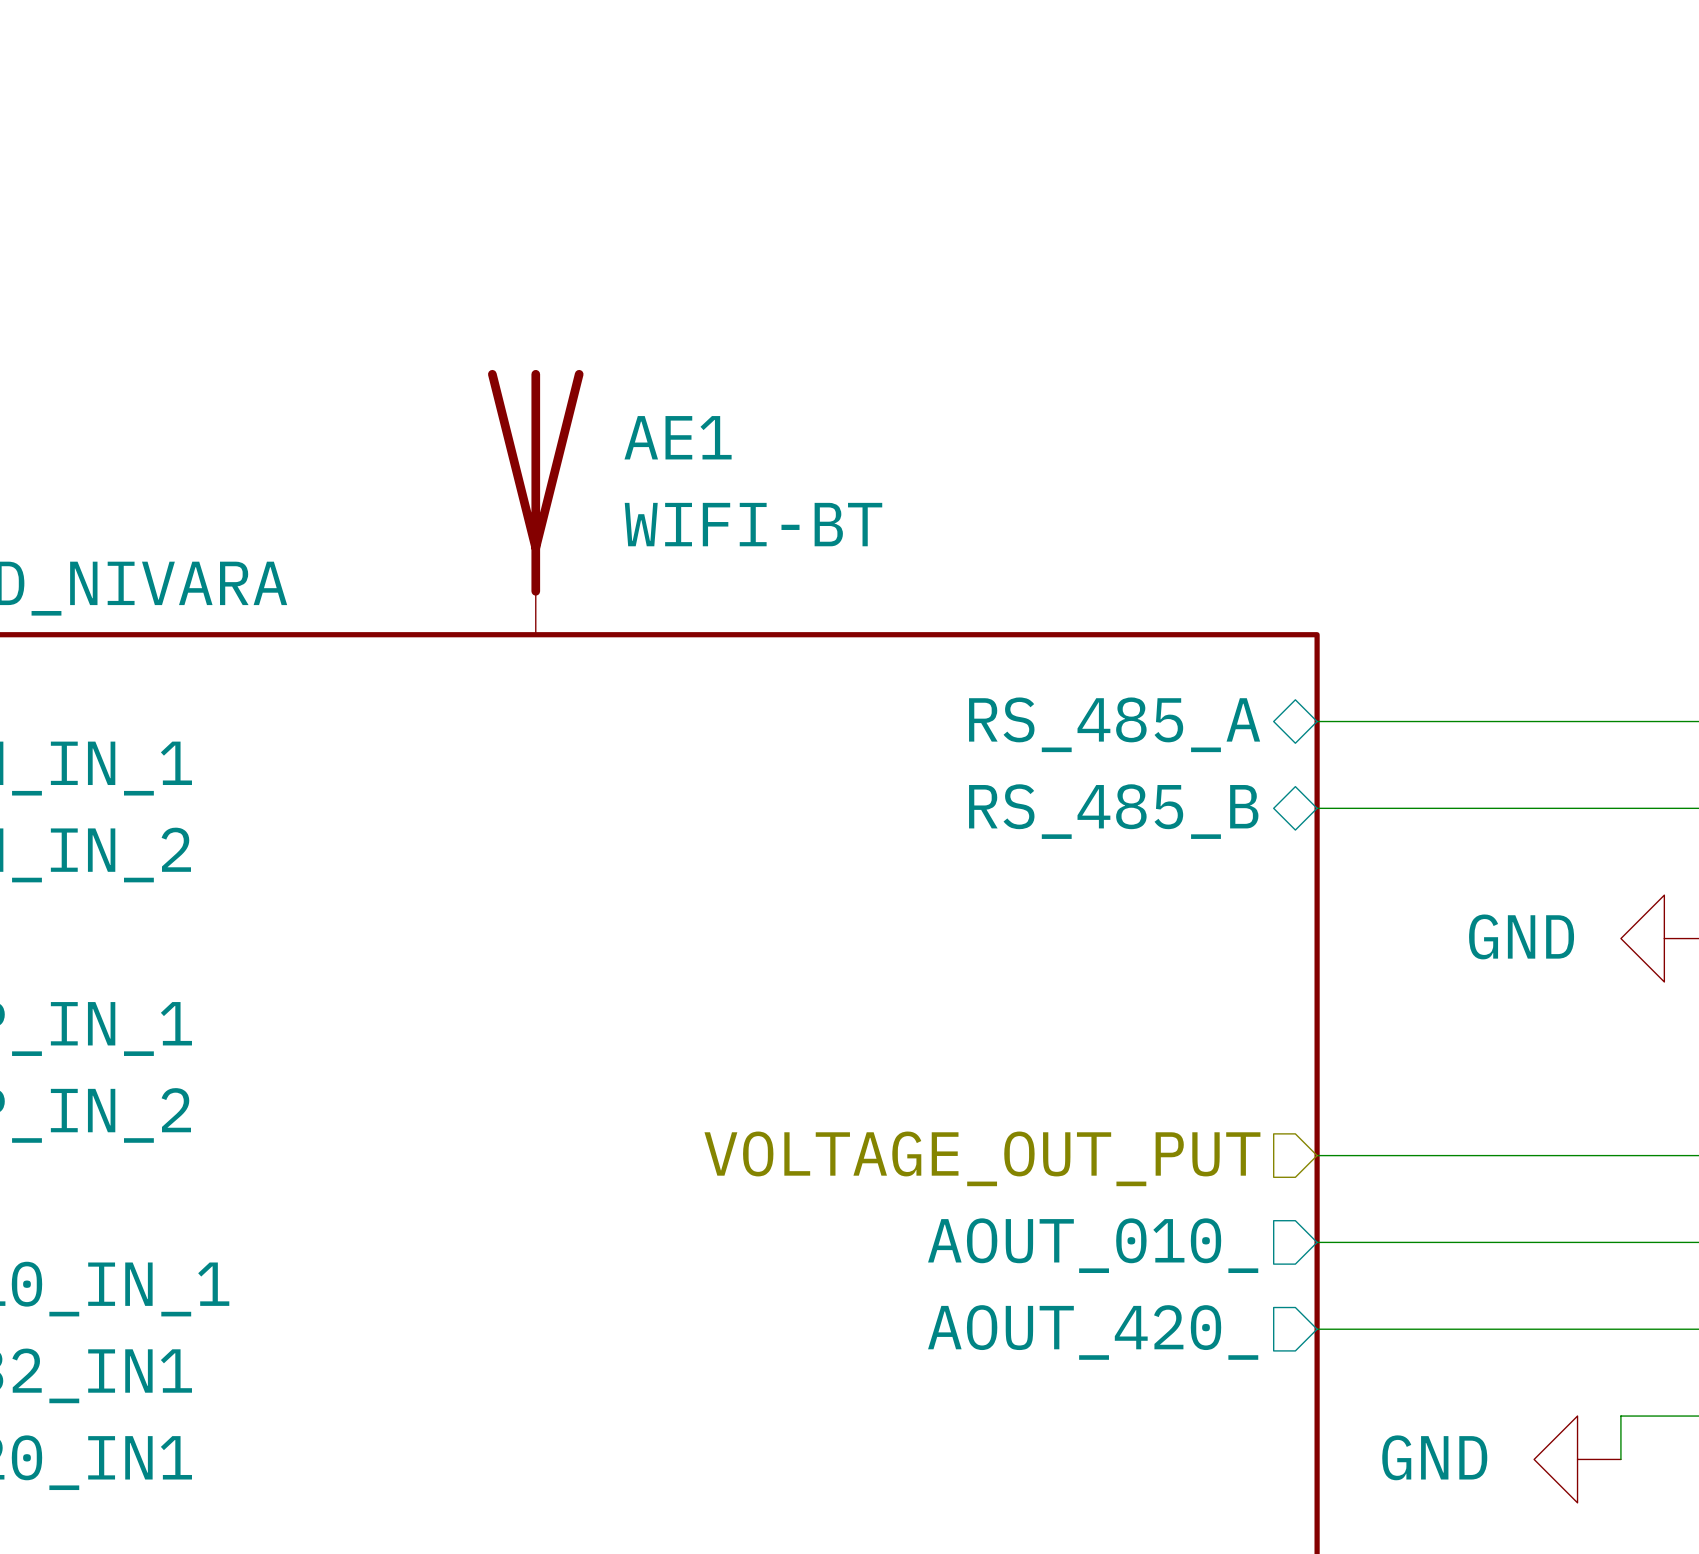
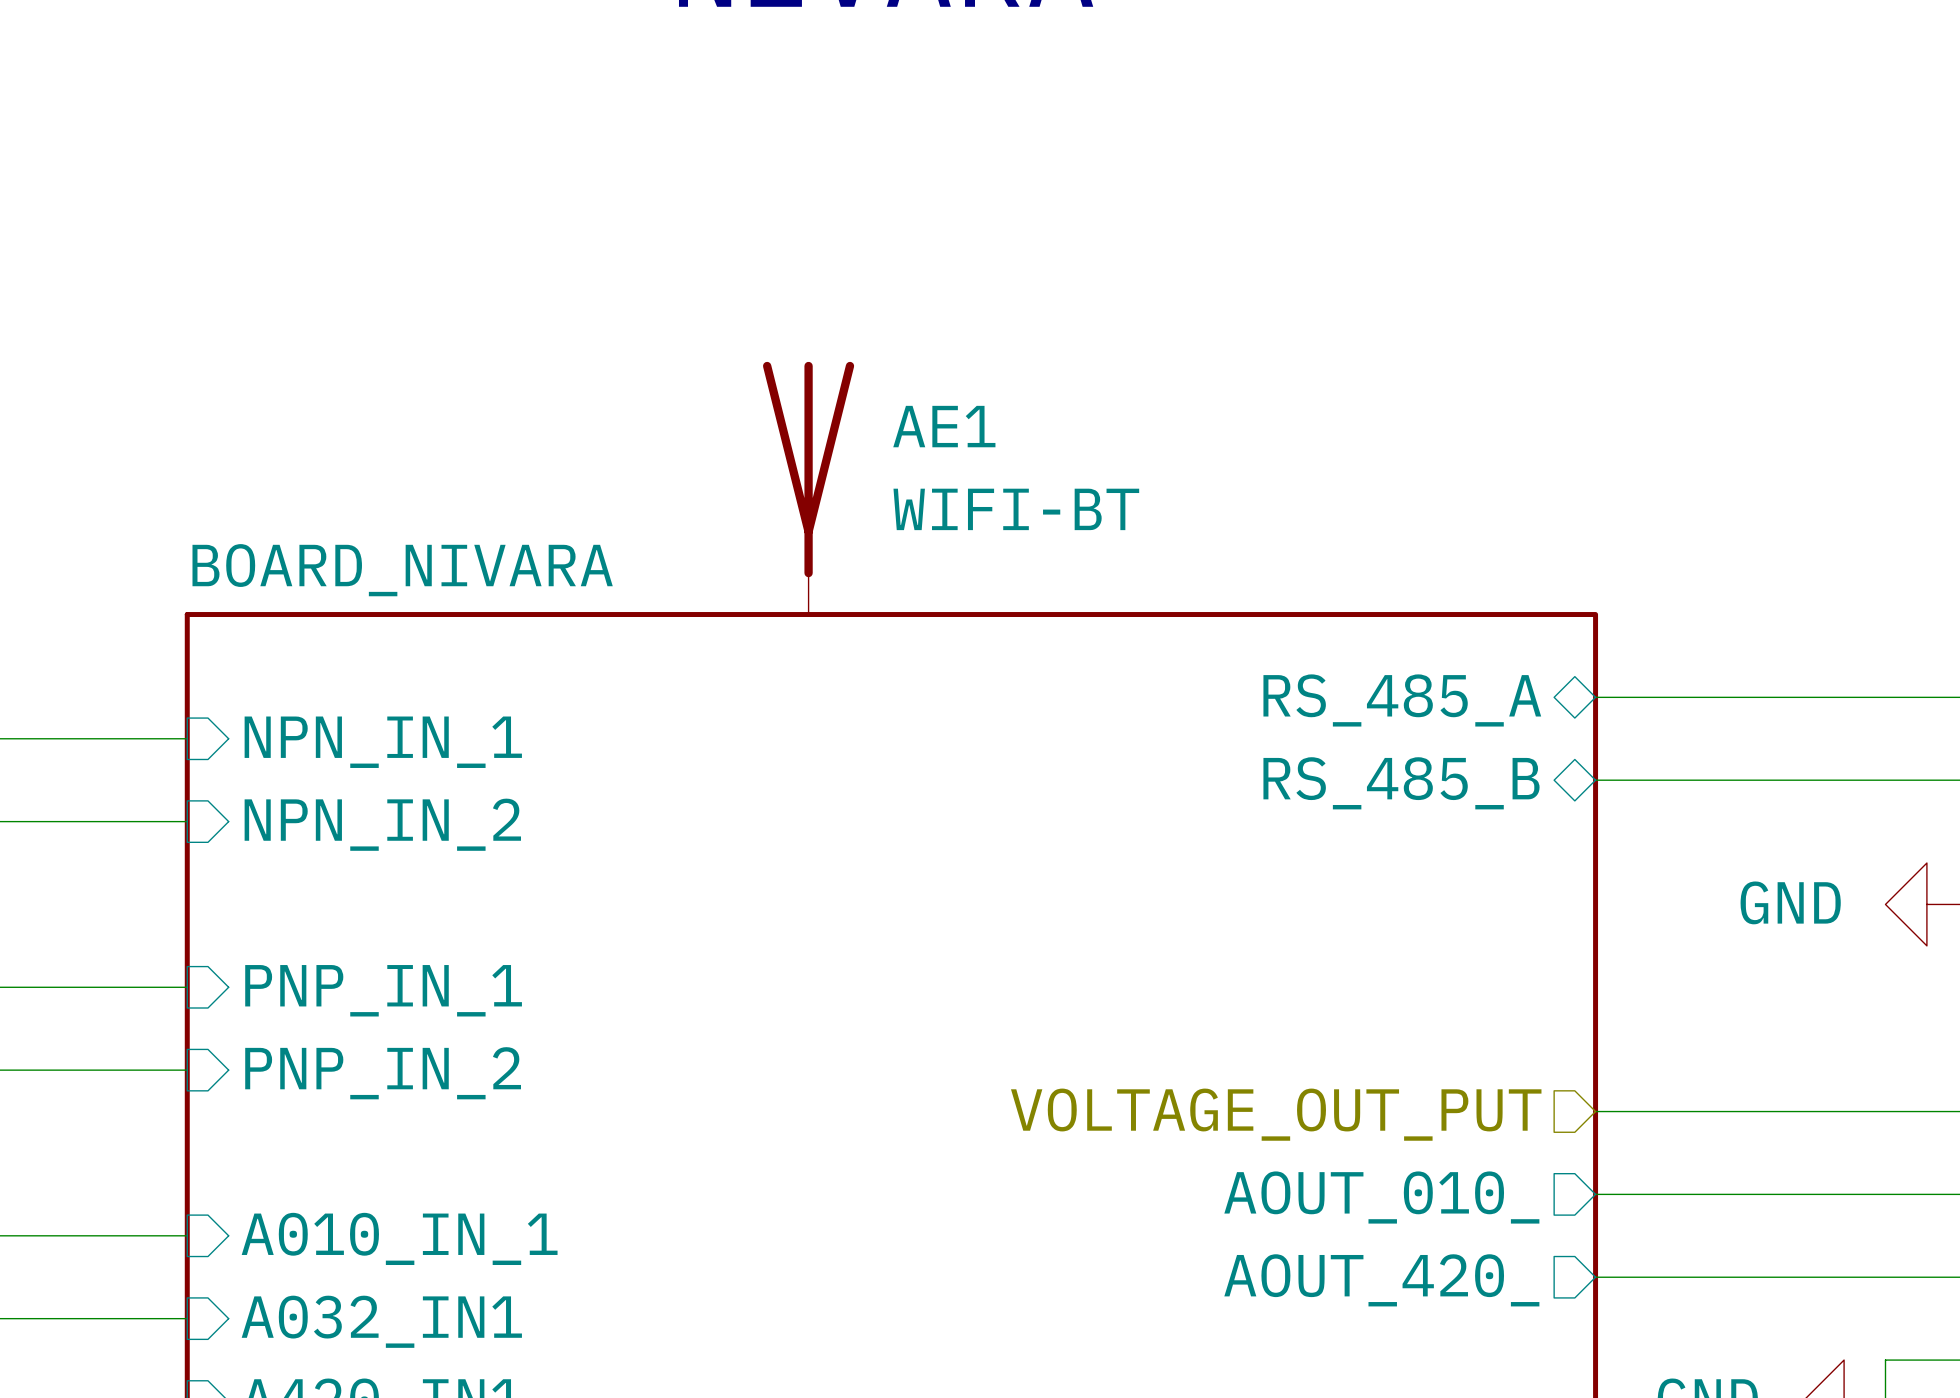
AE1 position: (535, 502) -> (808, 488)

